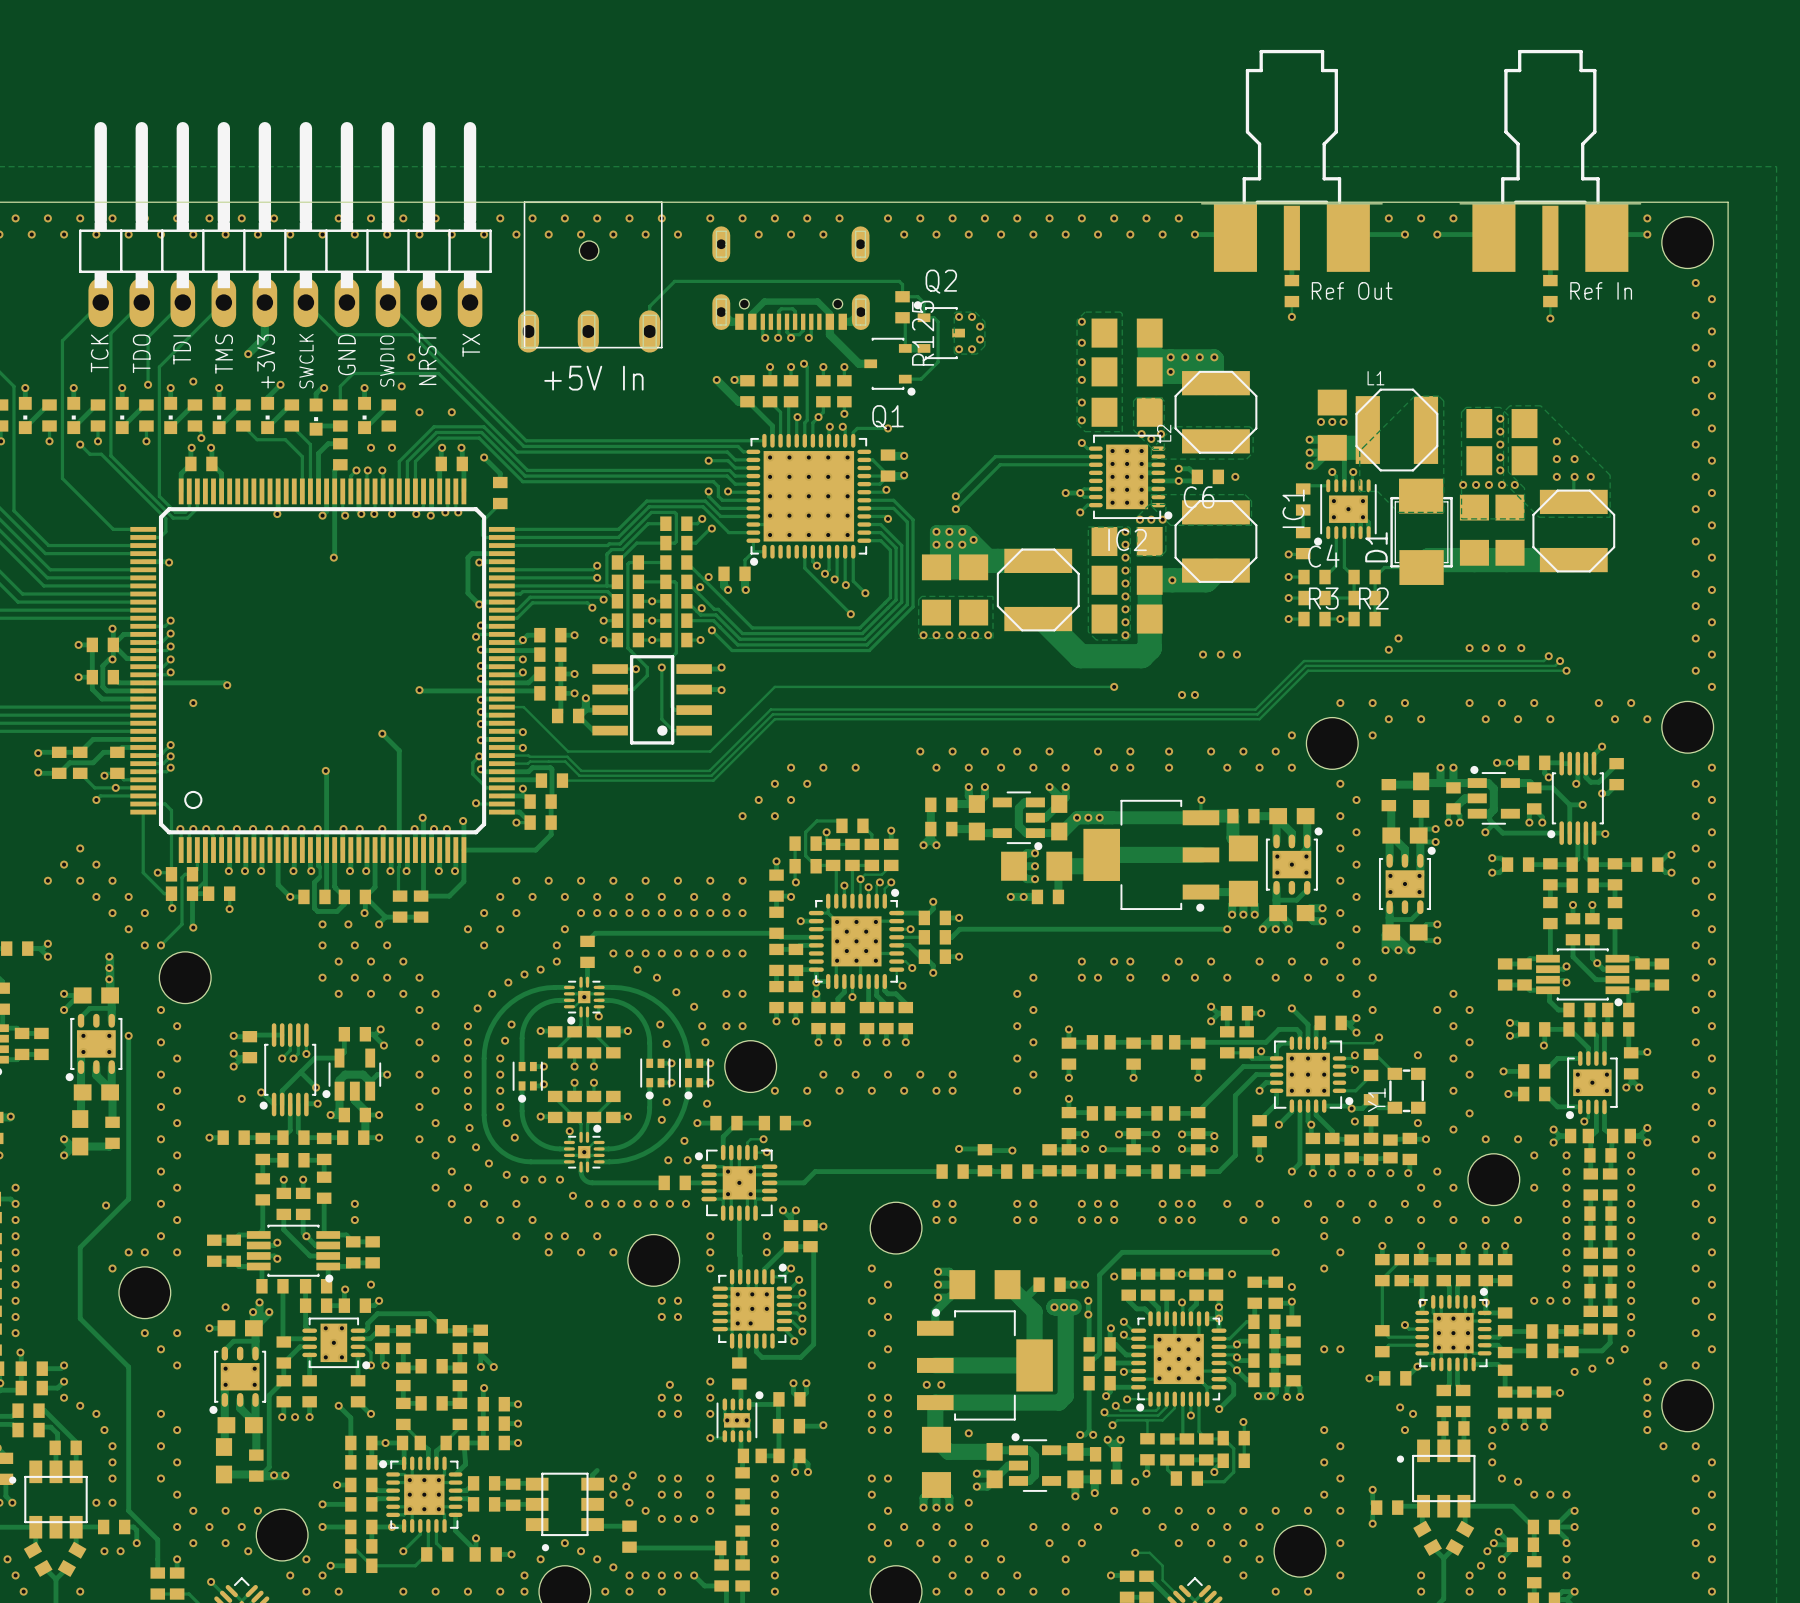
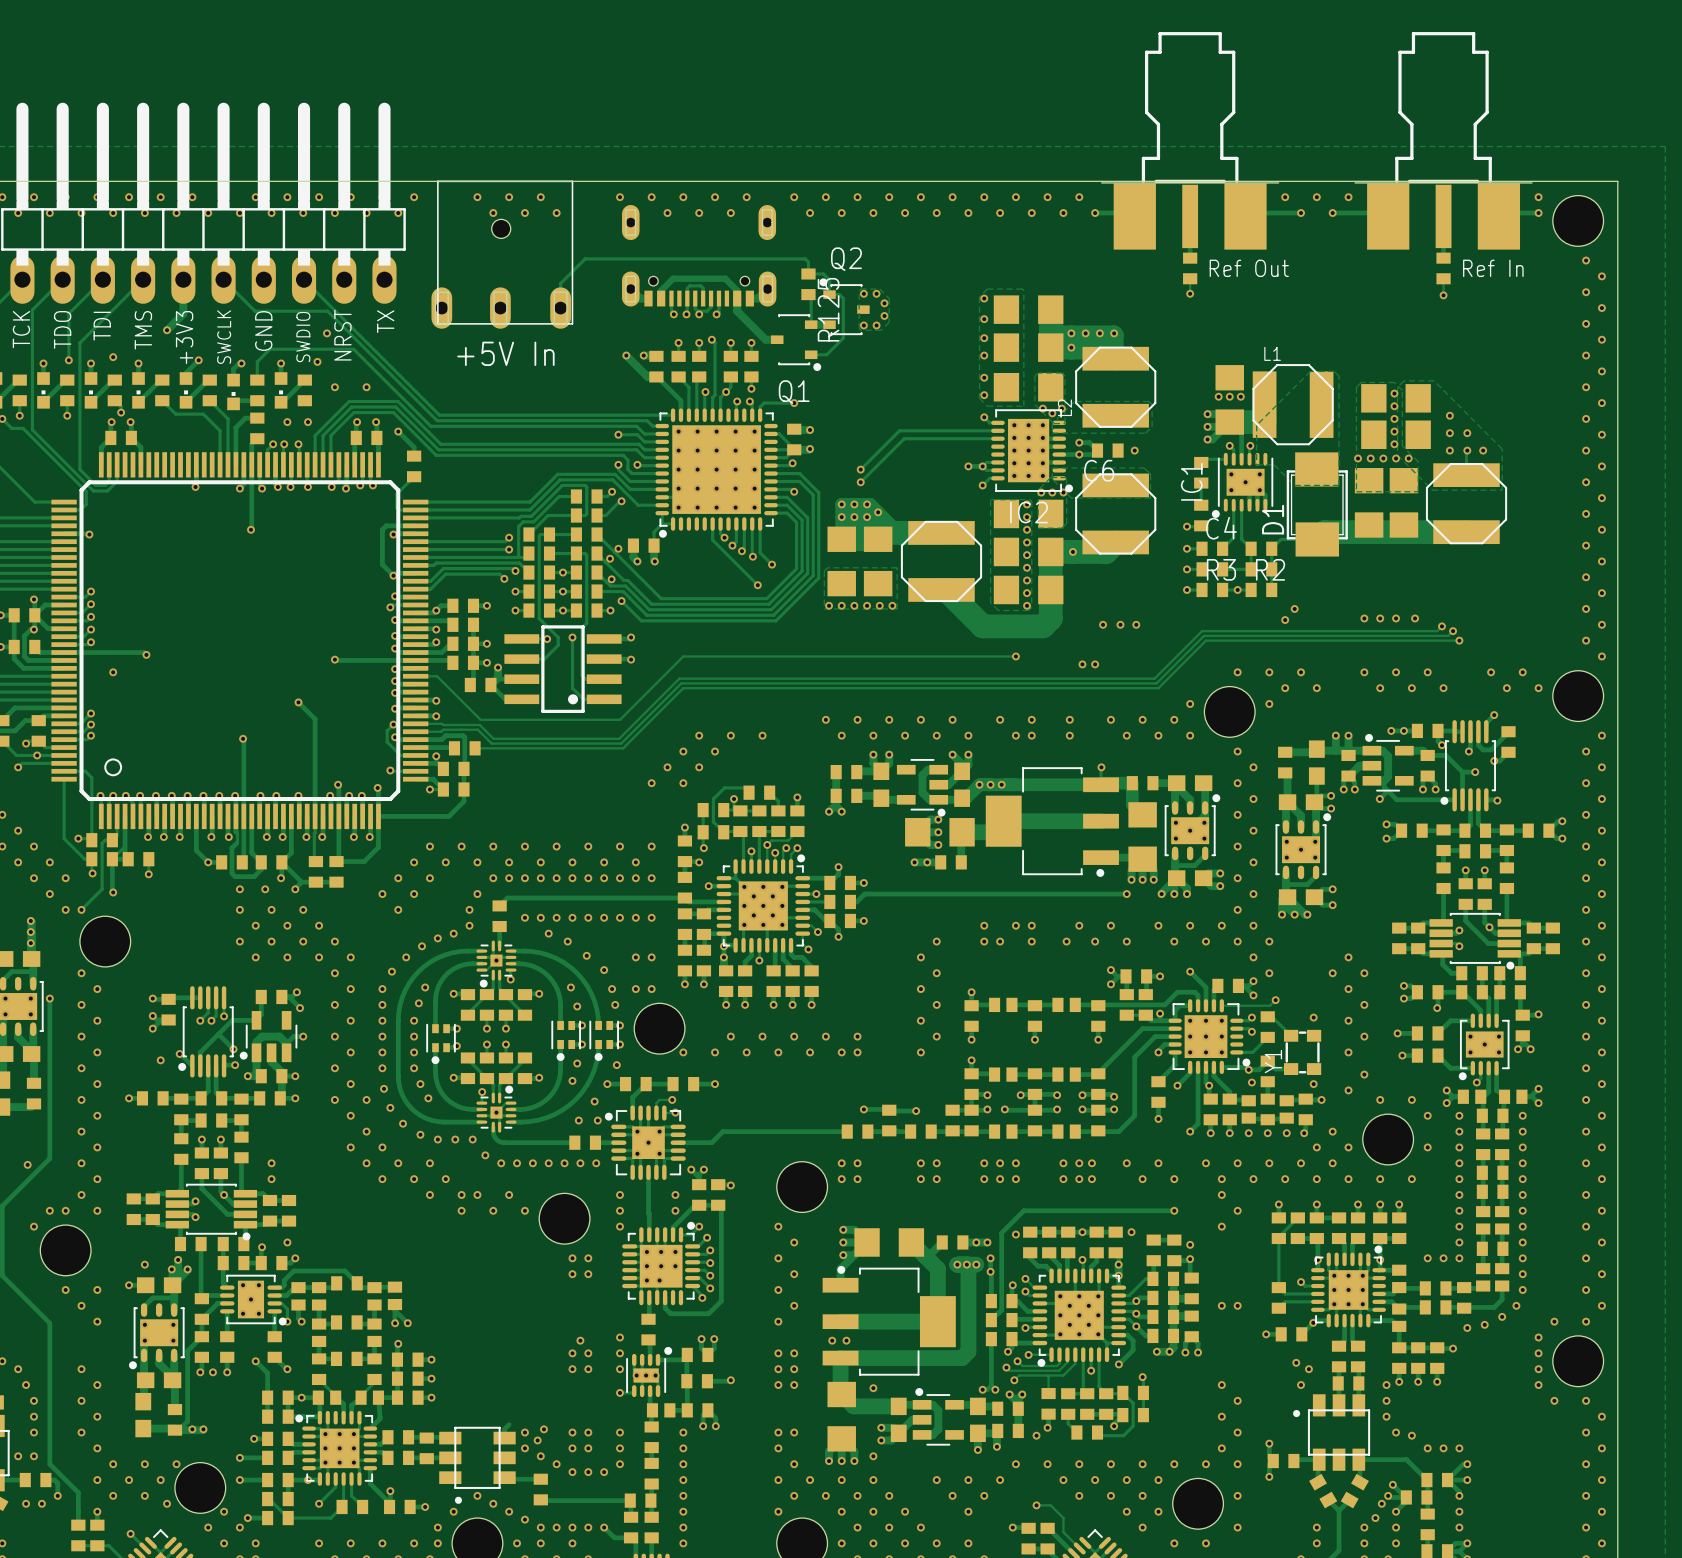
via: (532, 218) -> none
via: (661, 218) -> none
via: (516, 234) -> none
via: (548, 234) -> none
via: (677, 234) -> none

